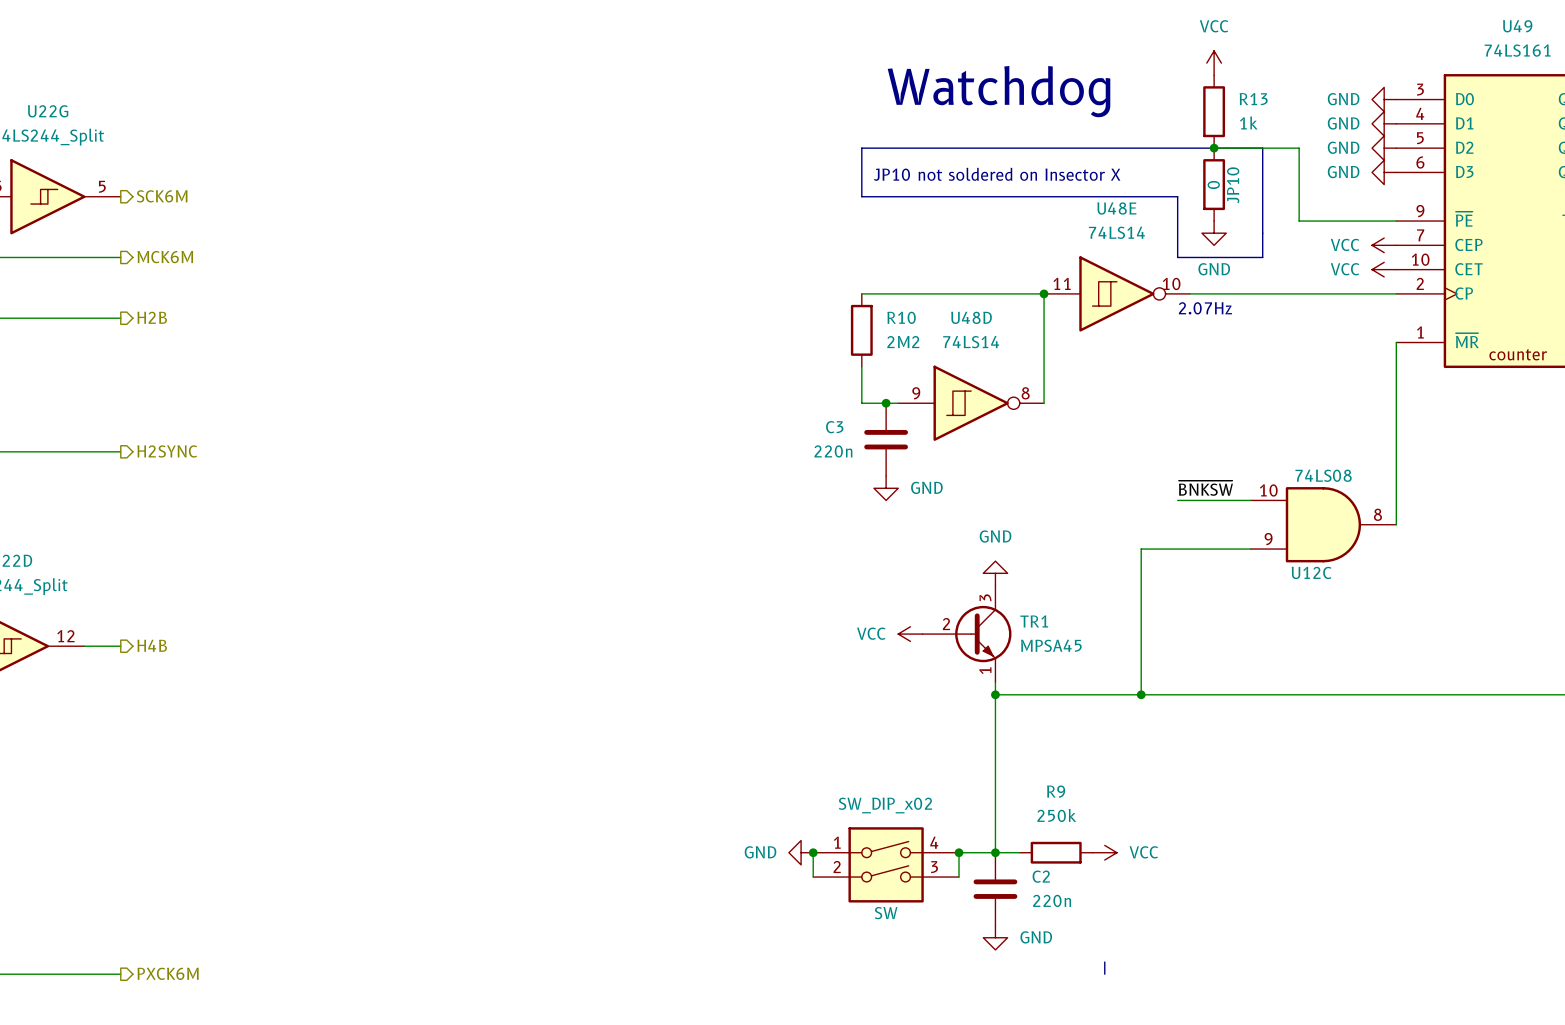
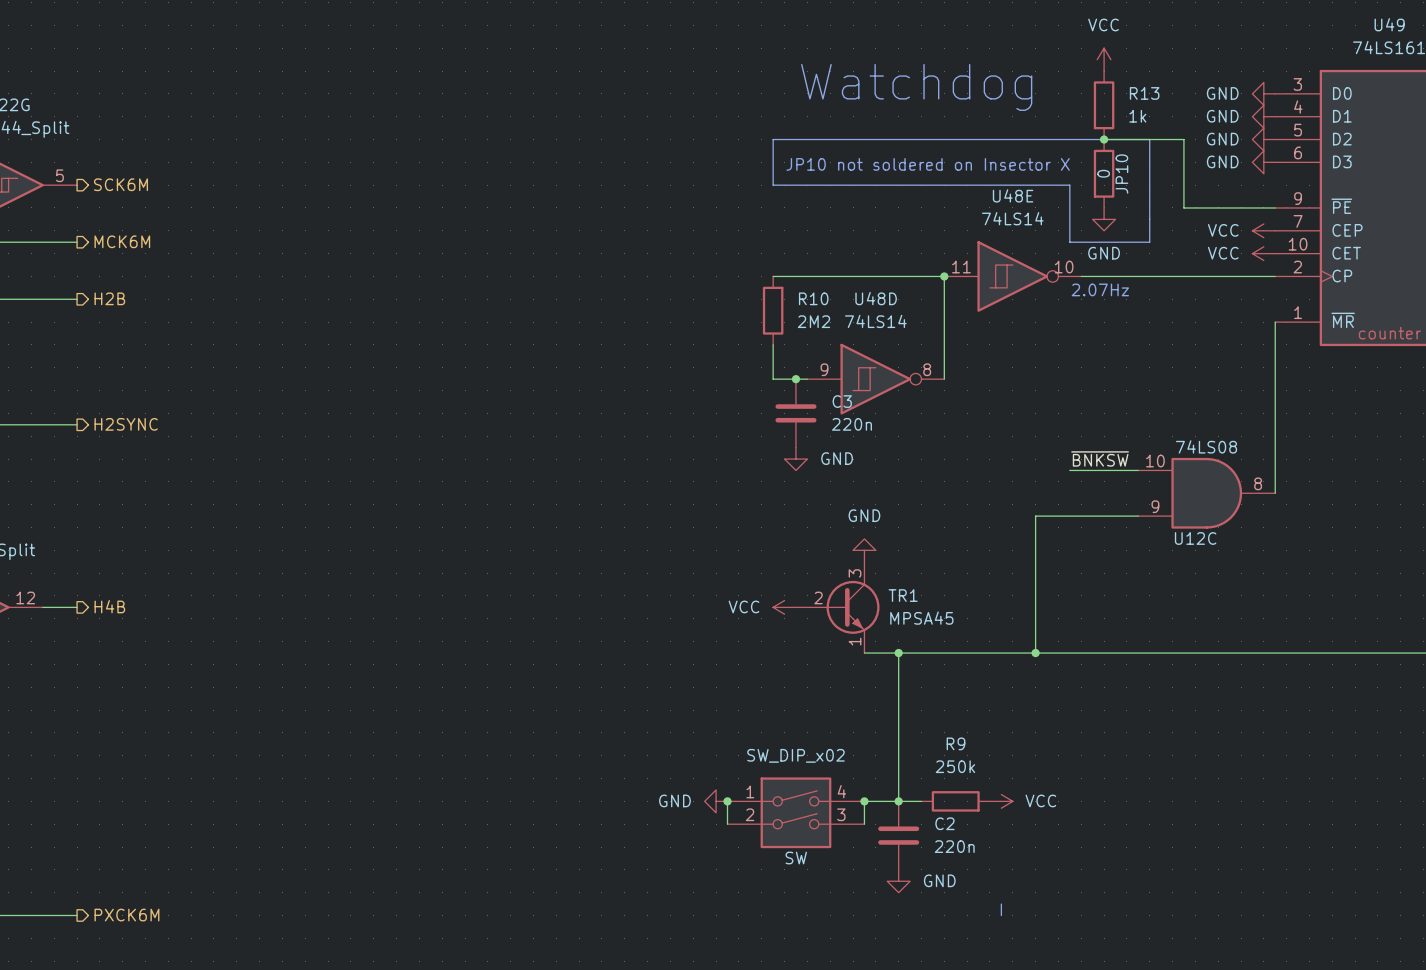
C3 name position: C3 (834, 427) -> C3 (842, 401)
C3 value position: 220n (833, 451) -> 220n (852, 424)
power symbol position: GND (995, 573) -> GND (864, 550)
power symbol position: VCC (910, 634) -> VCC (784, 607)
TR1 position: (967, 634) -> (837, 607)
wire: (995, 682) (995, 694) -> (864, 653) (898, 653)

